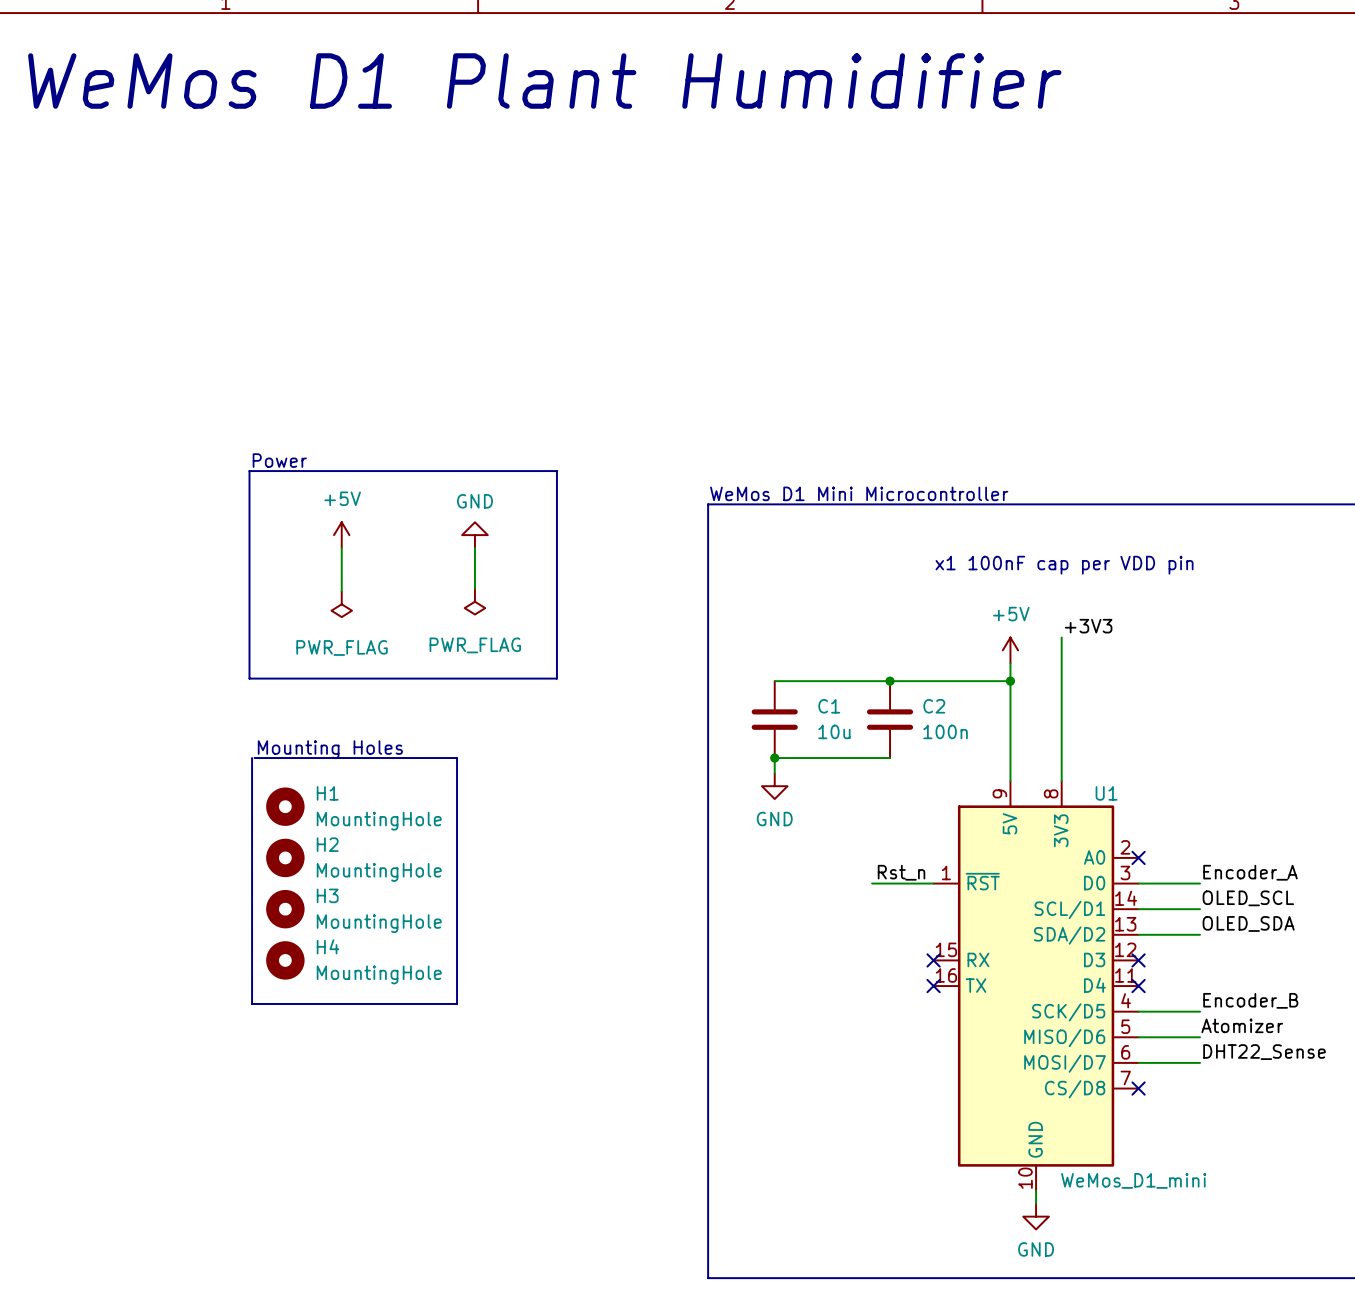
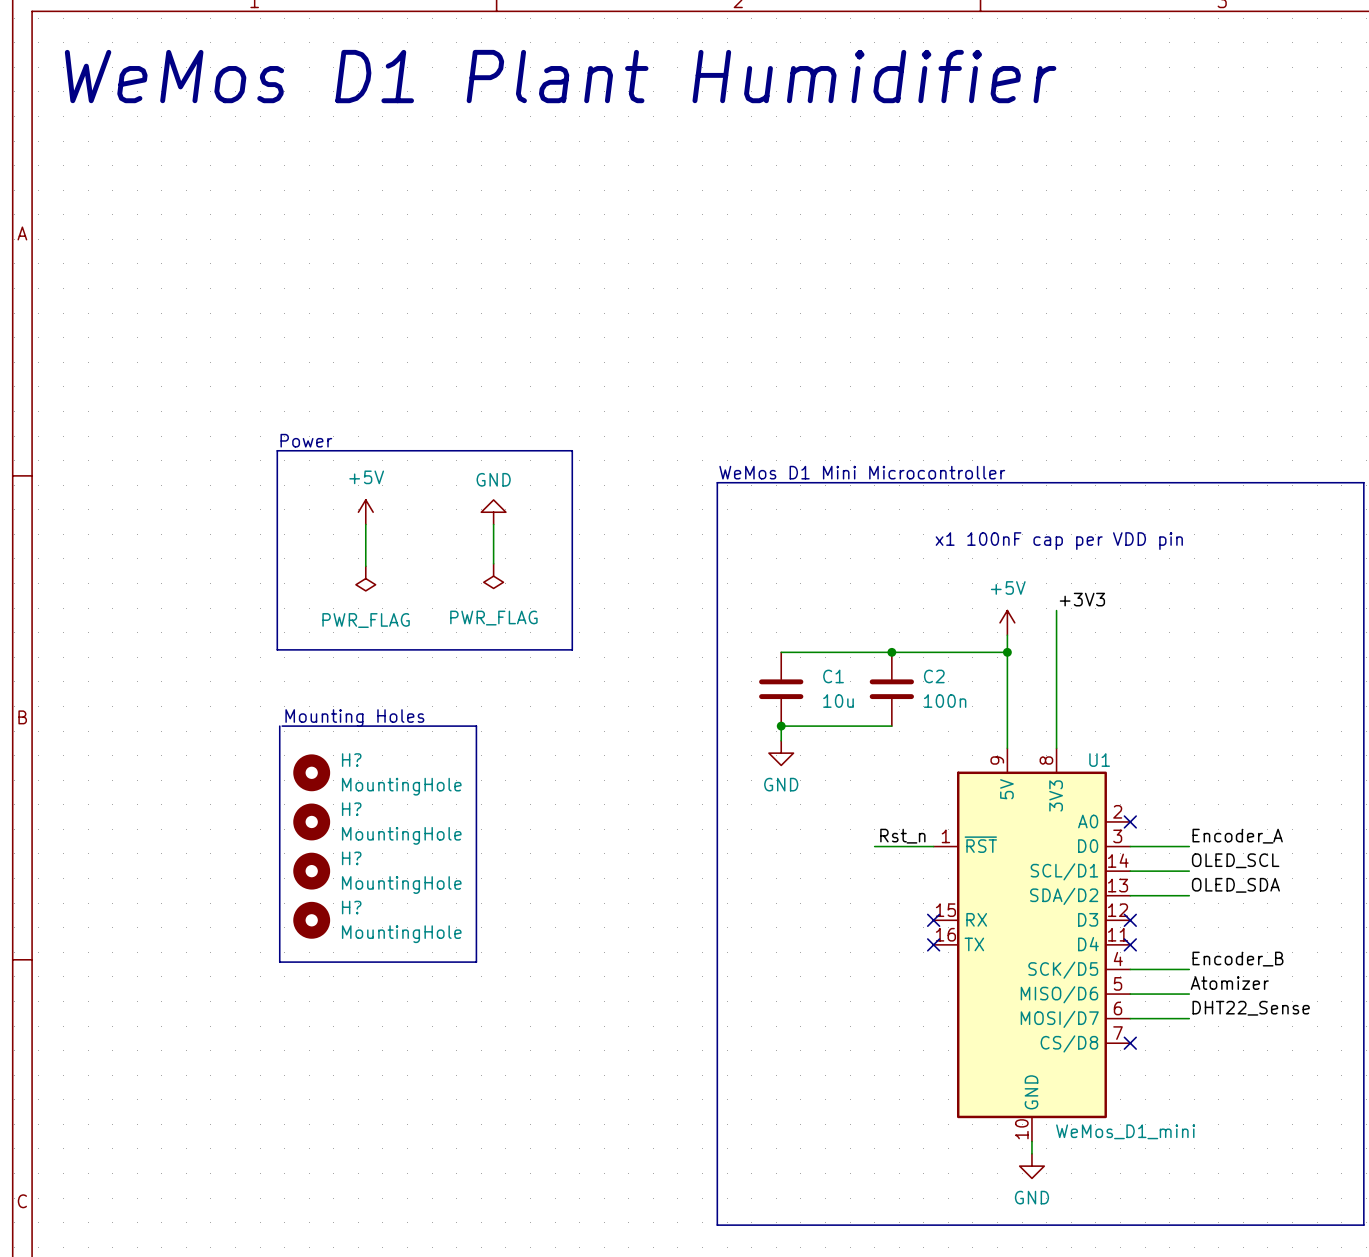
H1 name: H1 (327, 793) -> H? (351, 760)
H2 name: H2 (327, 844) -> H? (351, 809)
H3 name: H3 (327, 895) -> H? (351, 858)
H4 name: H4 (327, 946) -> H? (351, 907)

